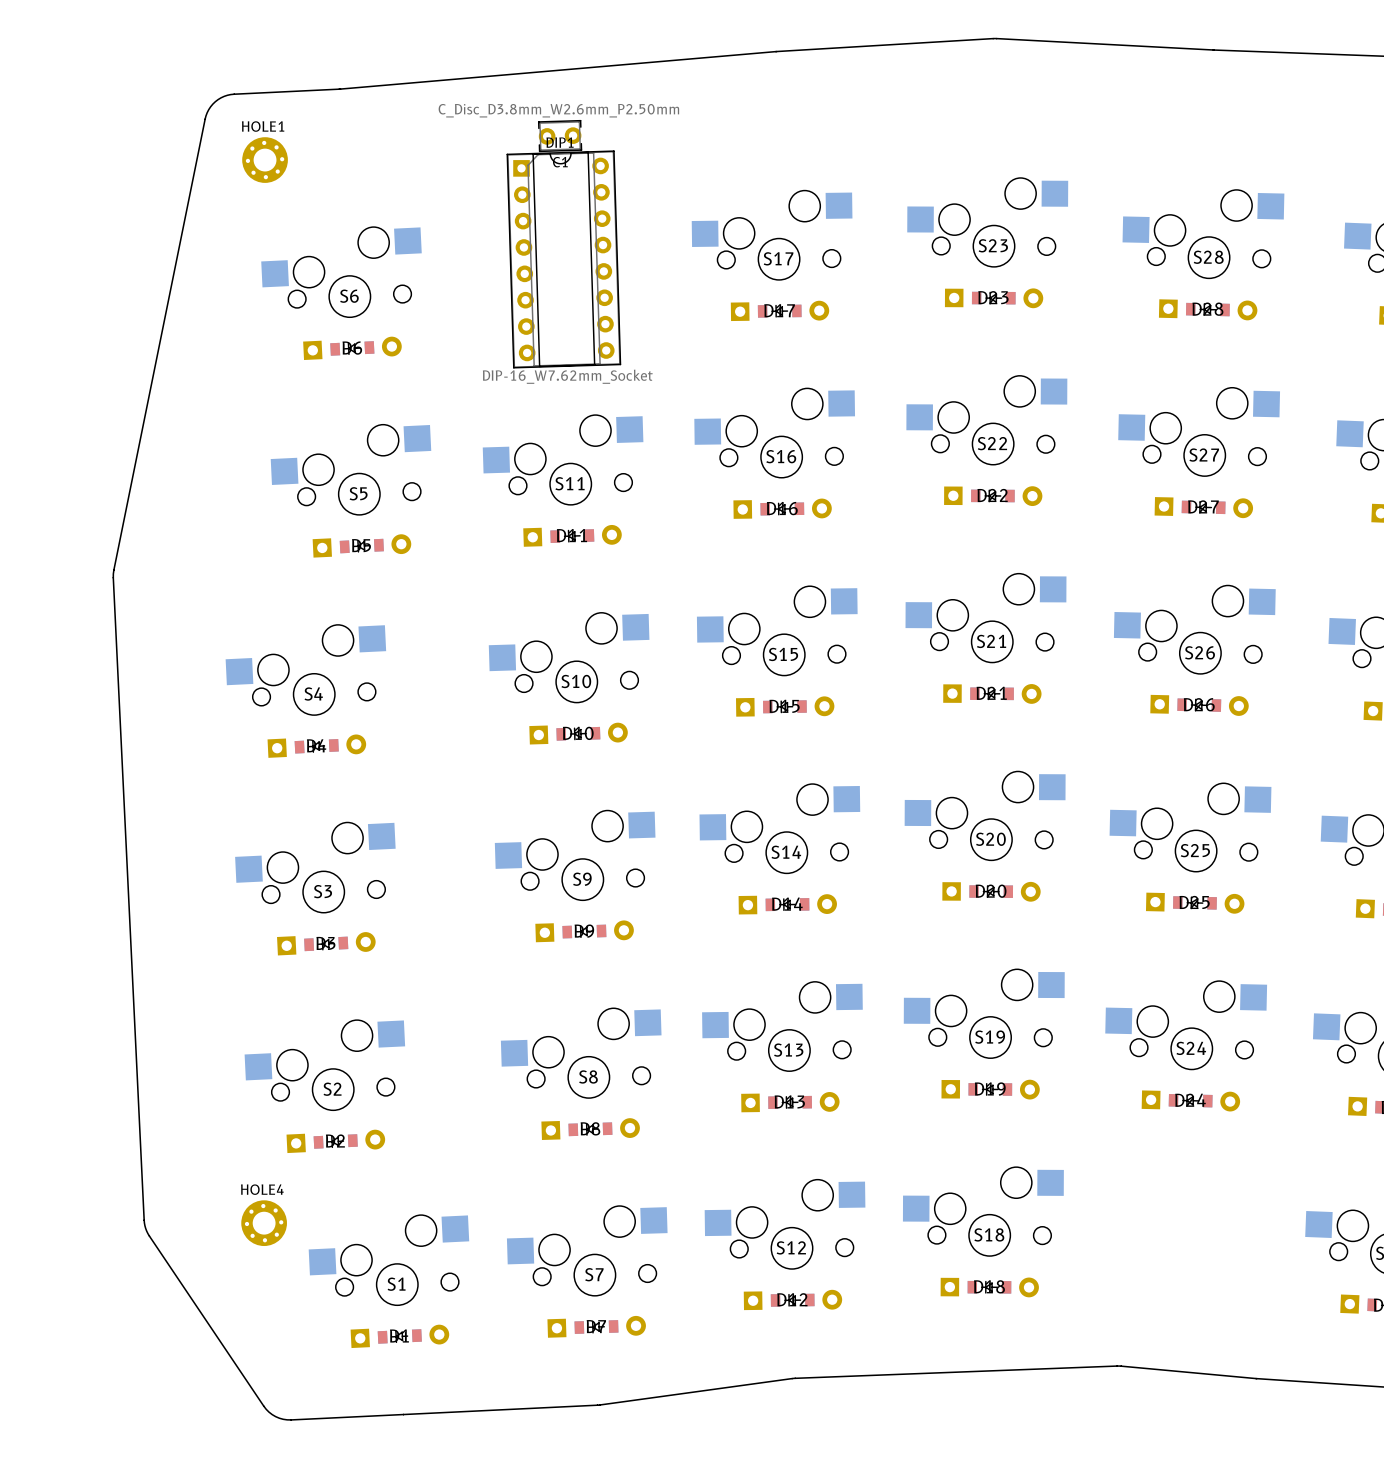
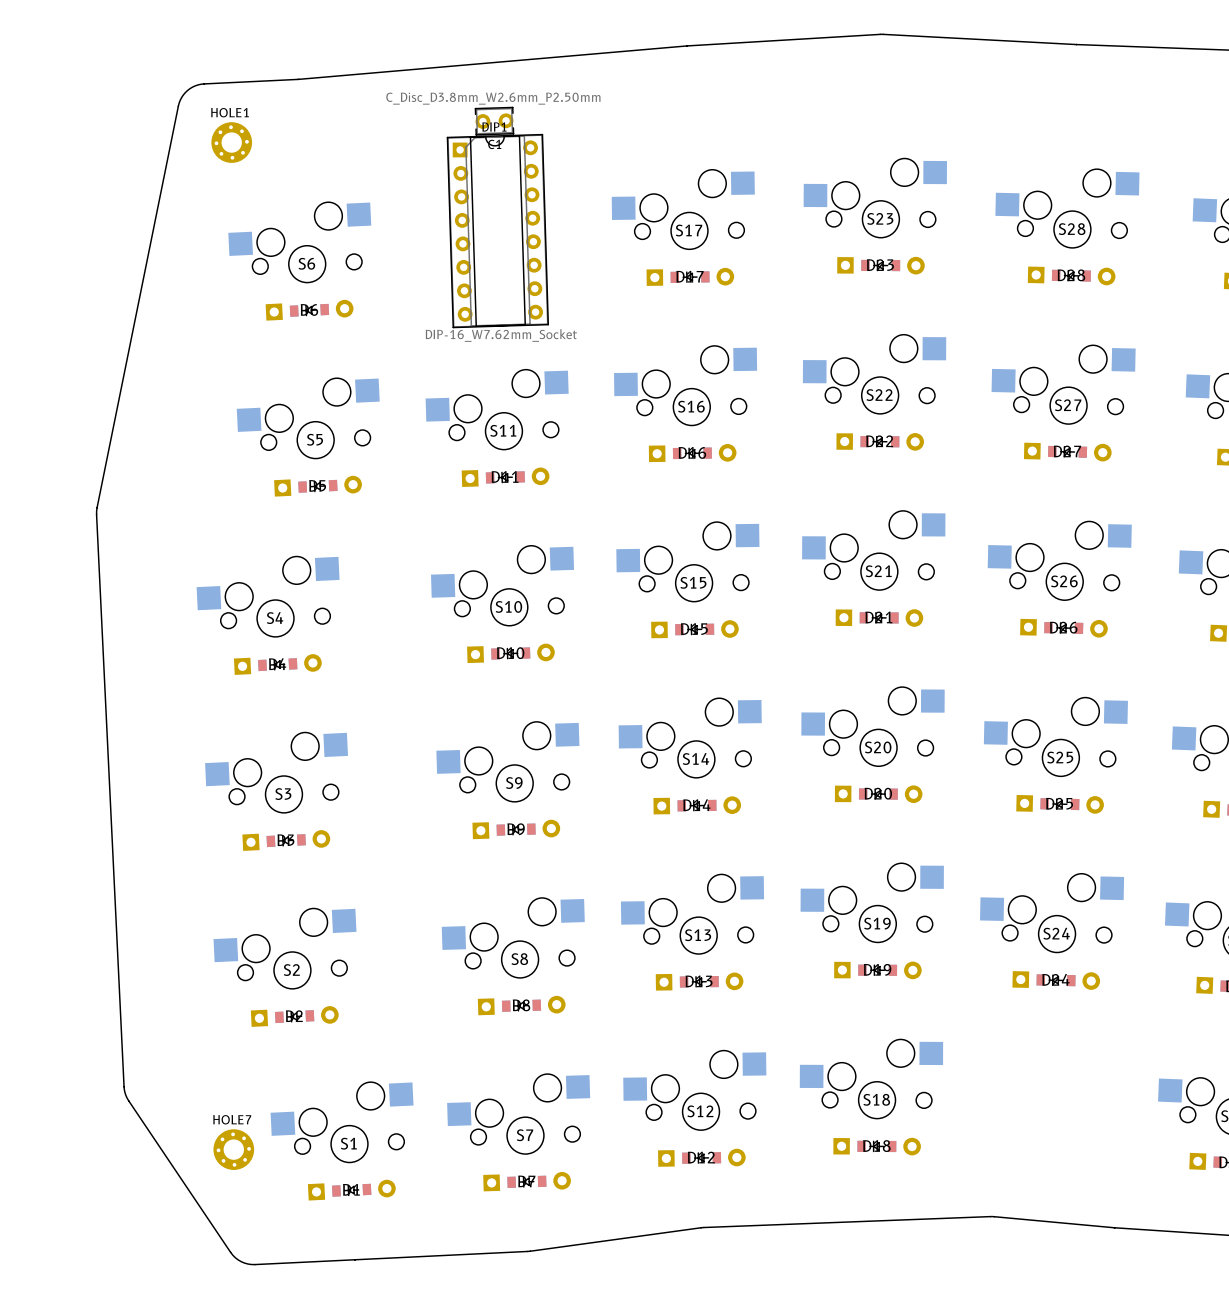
HOLE4: (264, 1223) -> none
HOLE7: none -> (233, 1149)

